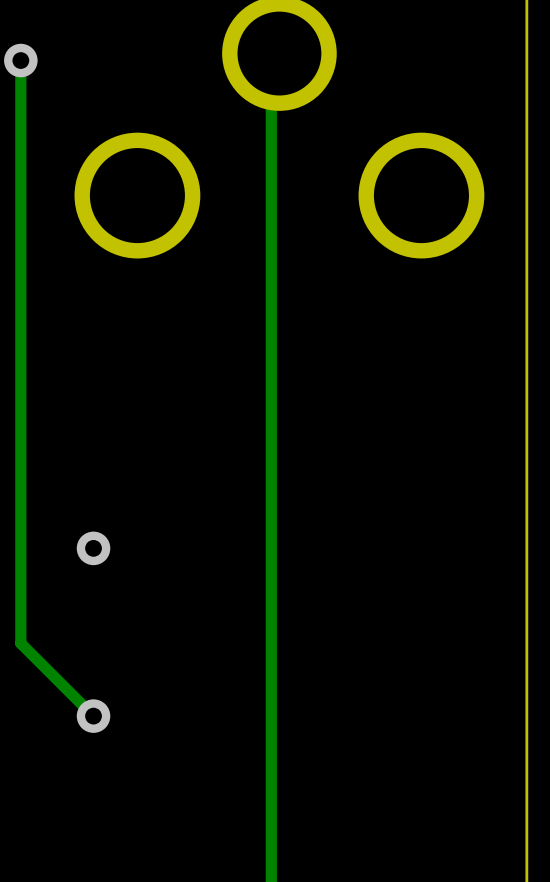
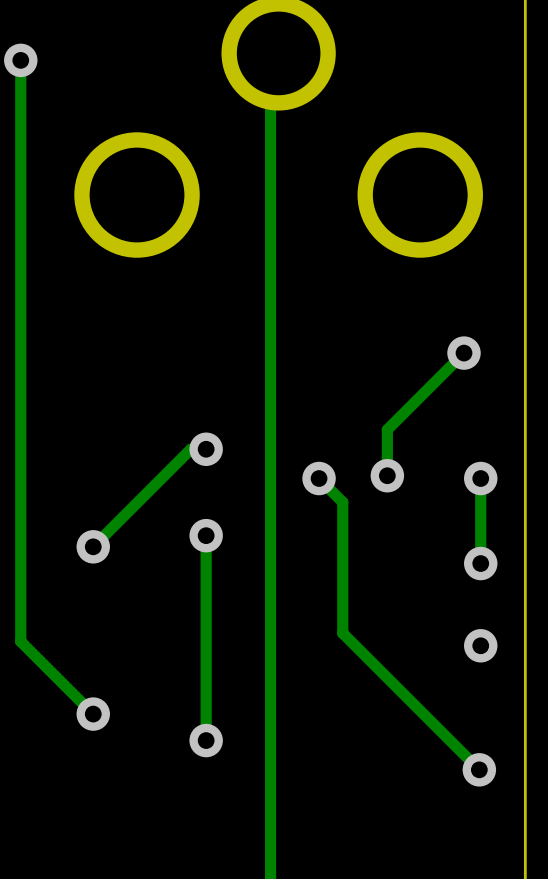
track: none -> (464, 353) (387, 429) (387, 475)
via: none -> (464, 353)
track: none -> (206, 449) (190, 449) (93, 546)
via: none -> (206, 449)
via: none -> (387, 475)
track: none -> (319, 478) (342, 502) (342, 633) (479, 769)
via: none -> (319, 478)
track: none -> (480, 478) (480, 563)
via: none -> (480, 478)
track: none -> (206, 535) (206, 740)
via: none -> (206, 535)
via: none -> (480, 563)
via: none -> (480, 645)
via: none -> (206, 740)
via: none -> (479, 769)

